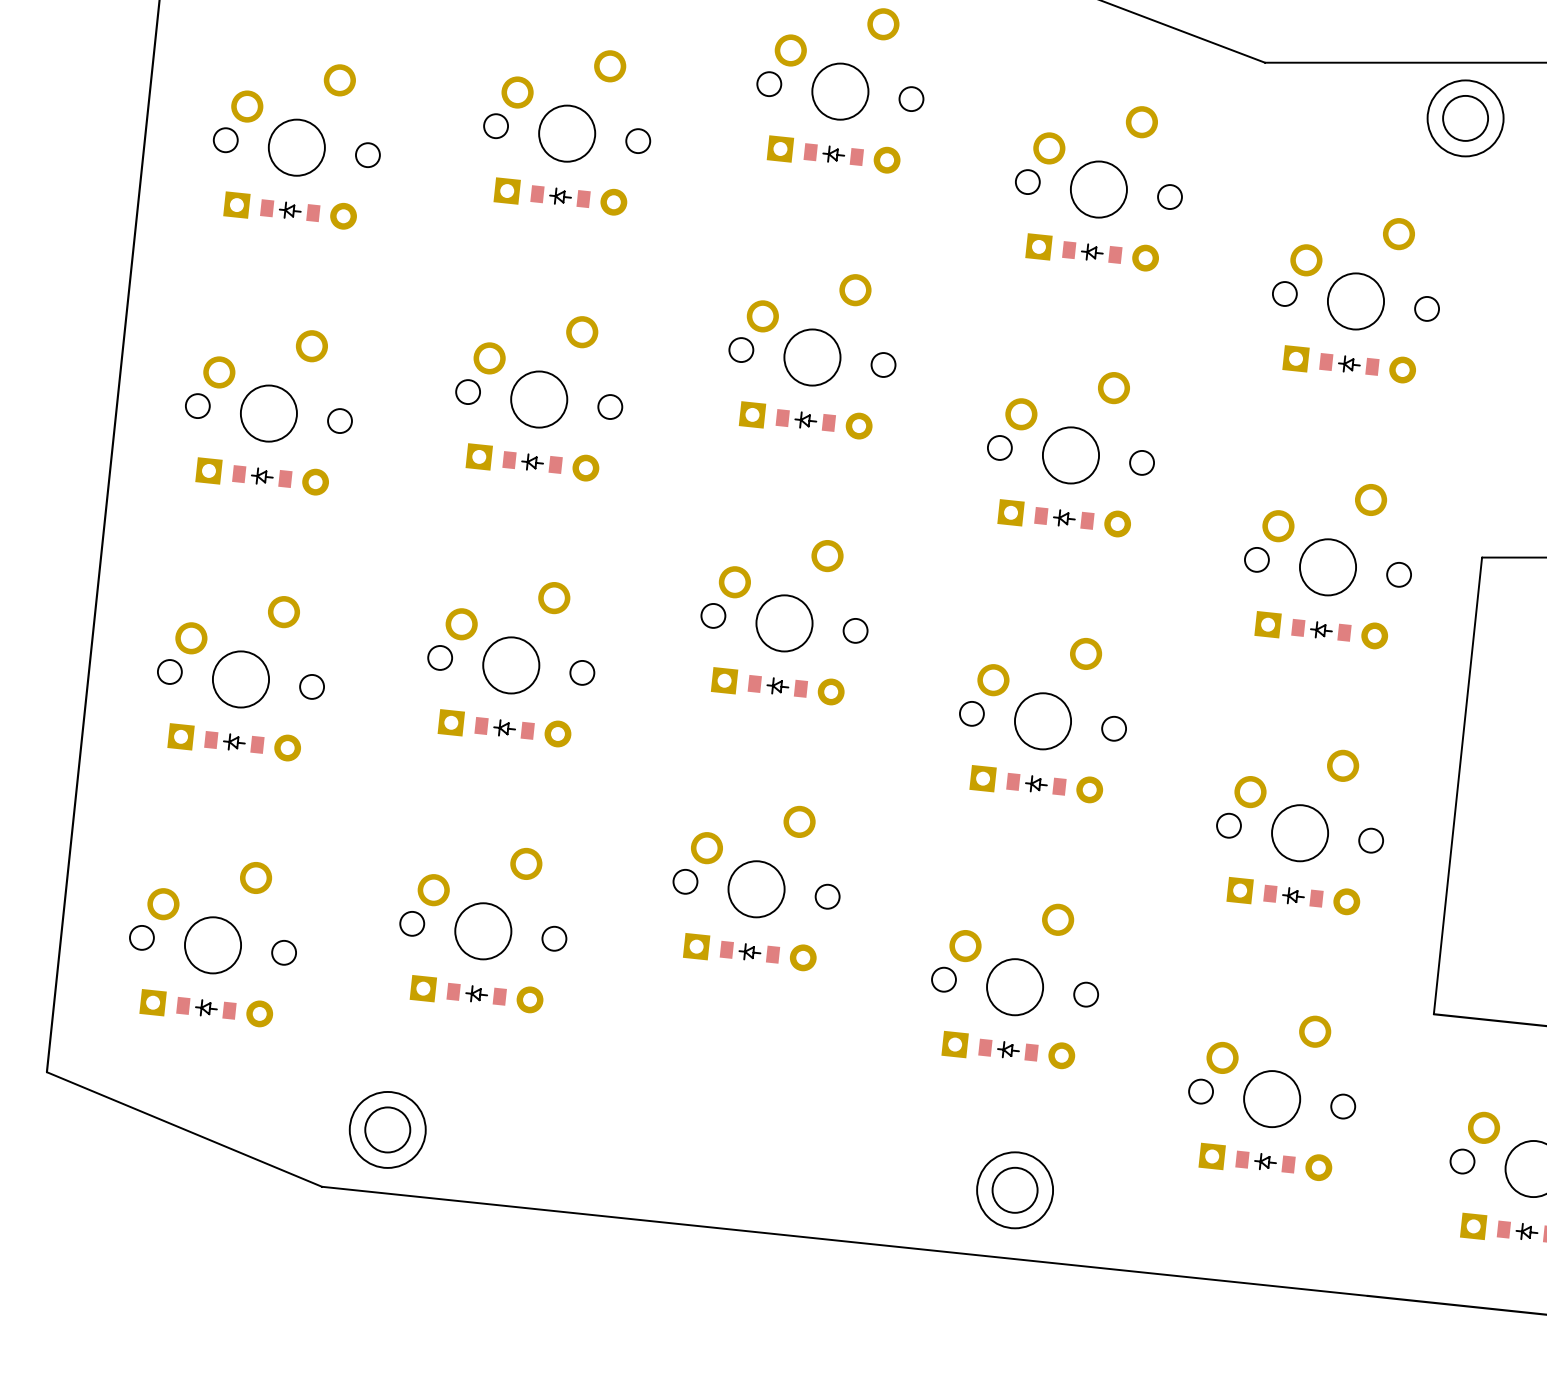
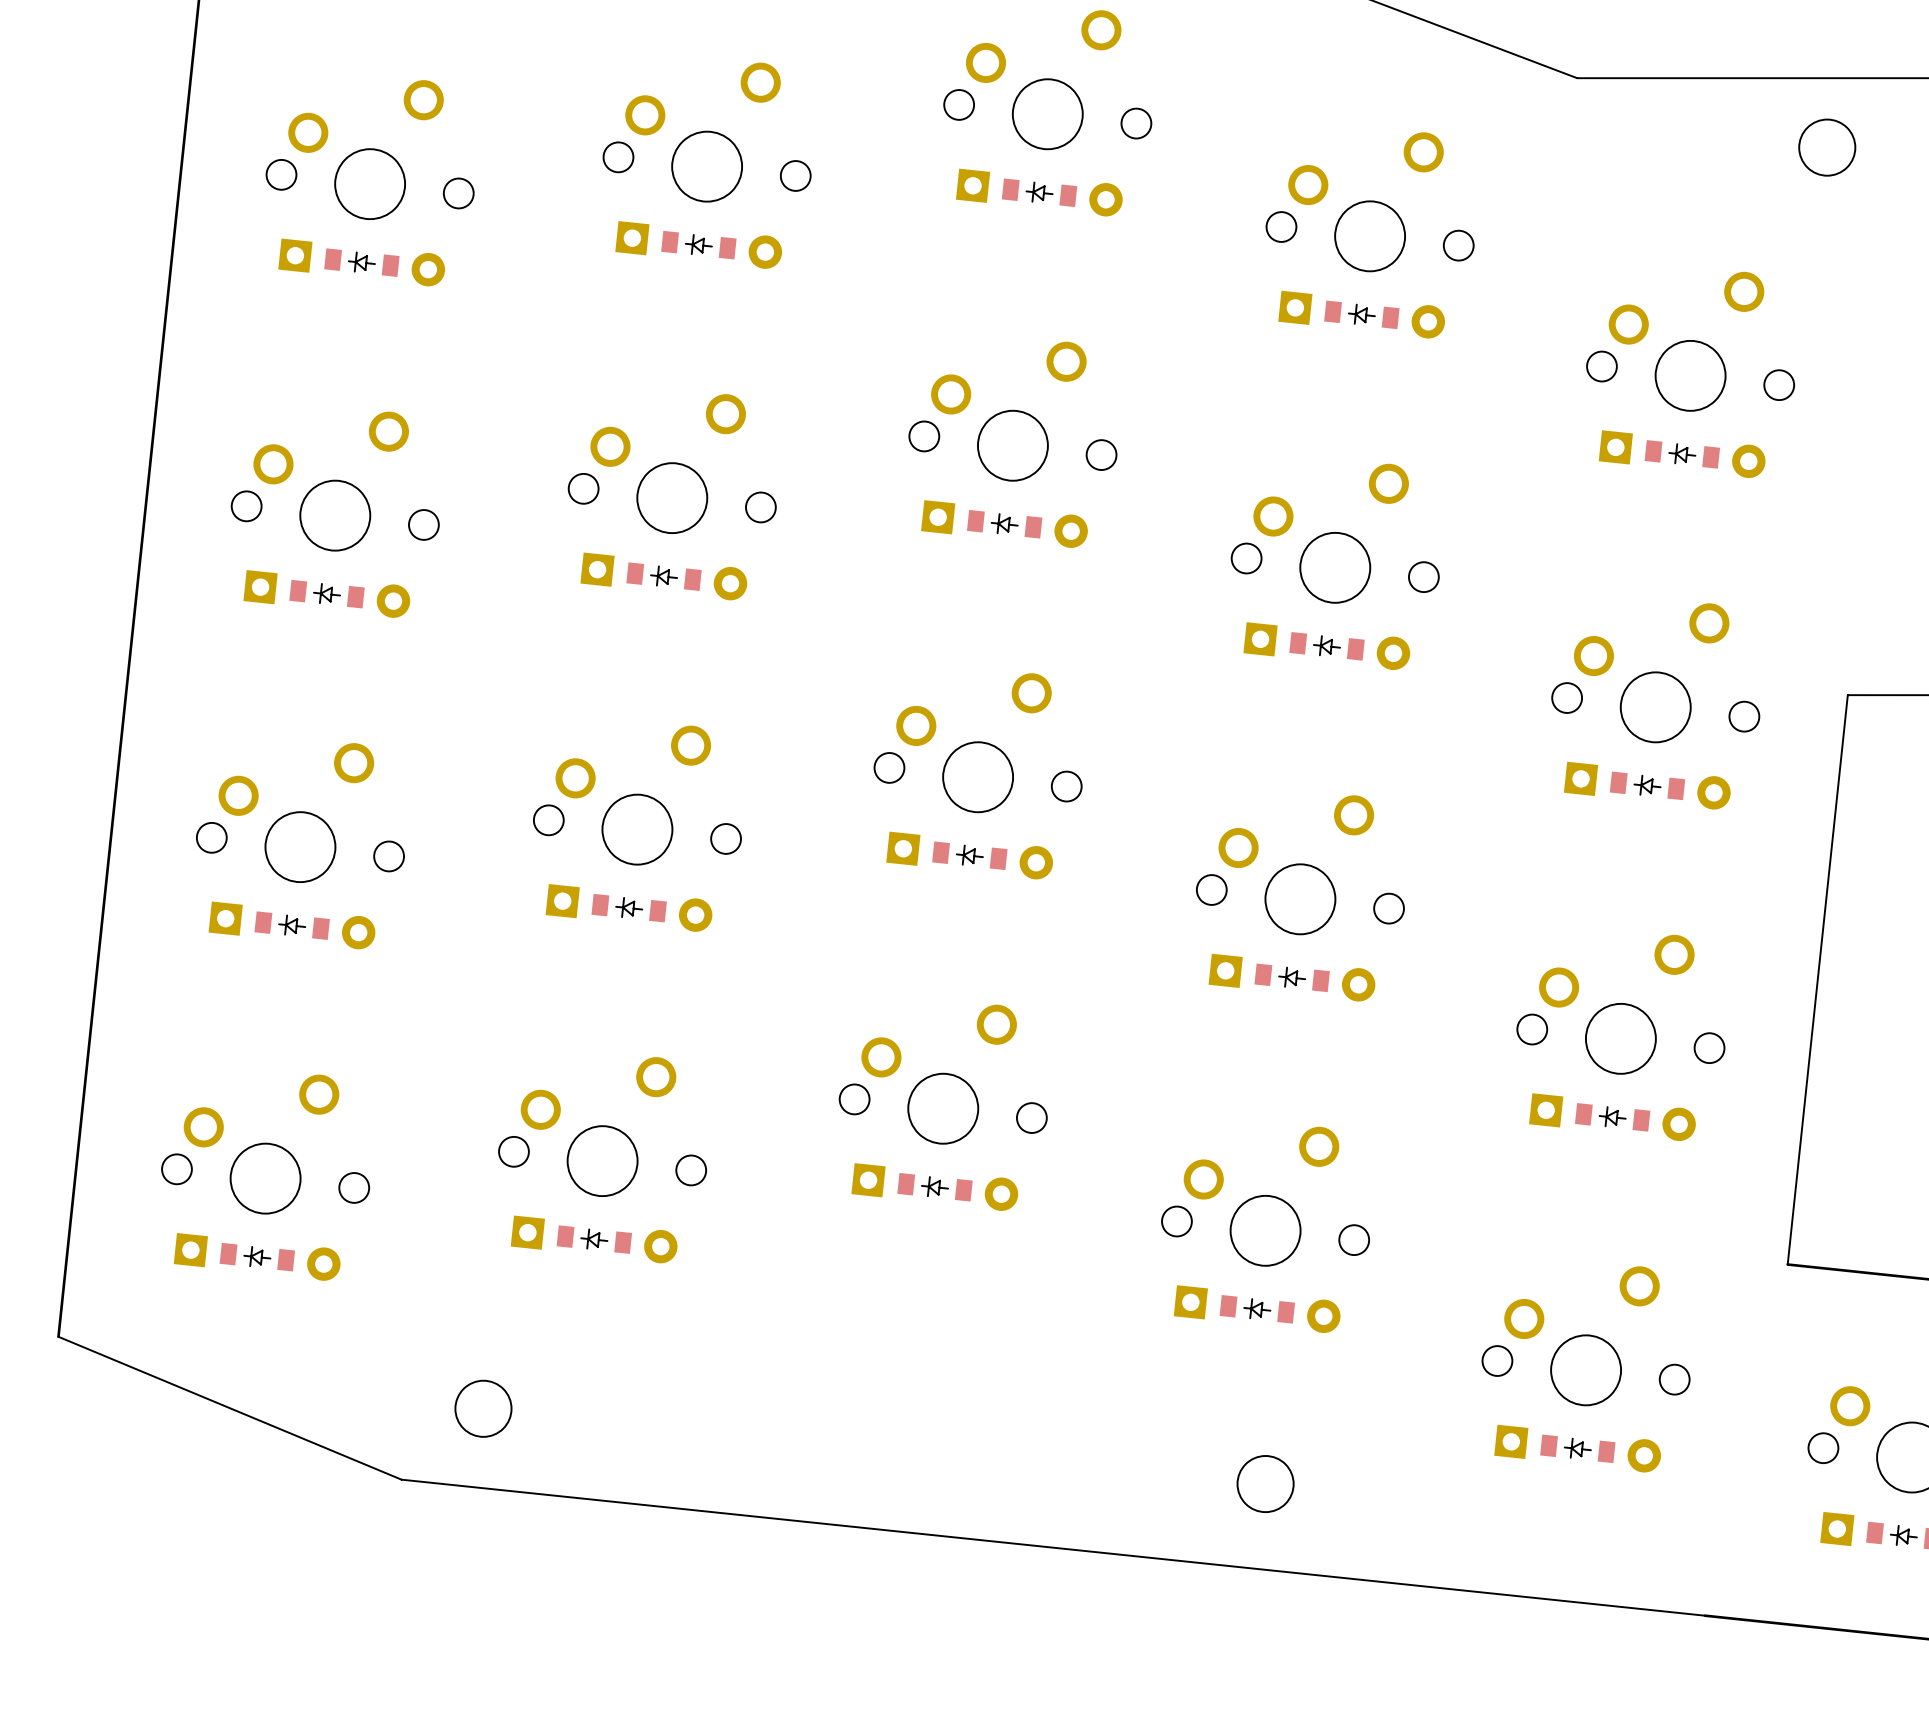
round board edge: [1427, 80, 1504, 157] -> none
round board edge: [349, 1091, 427, 1169] -> none
round board edge: [976, 1151, 1054, 1229] -> none

